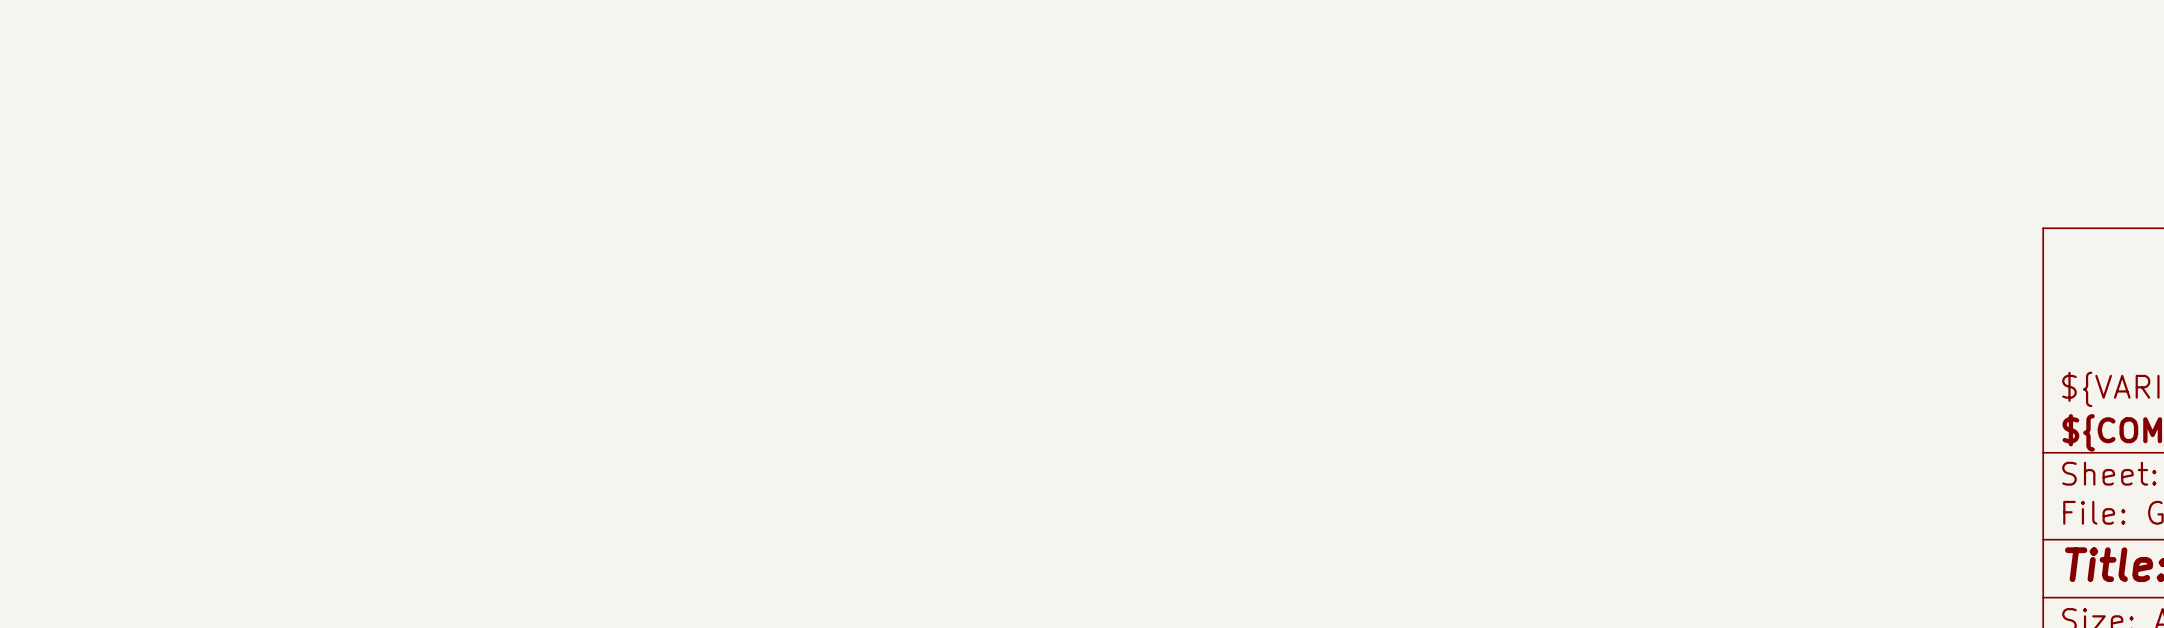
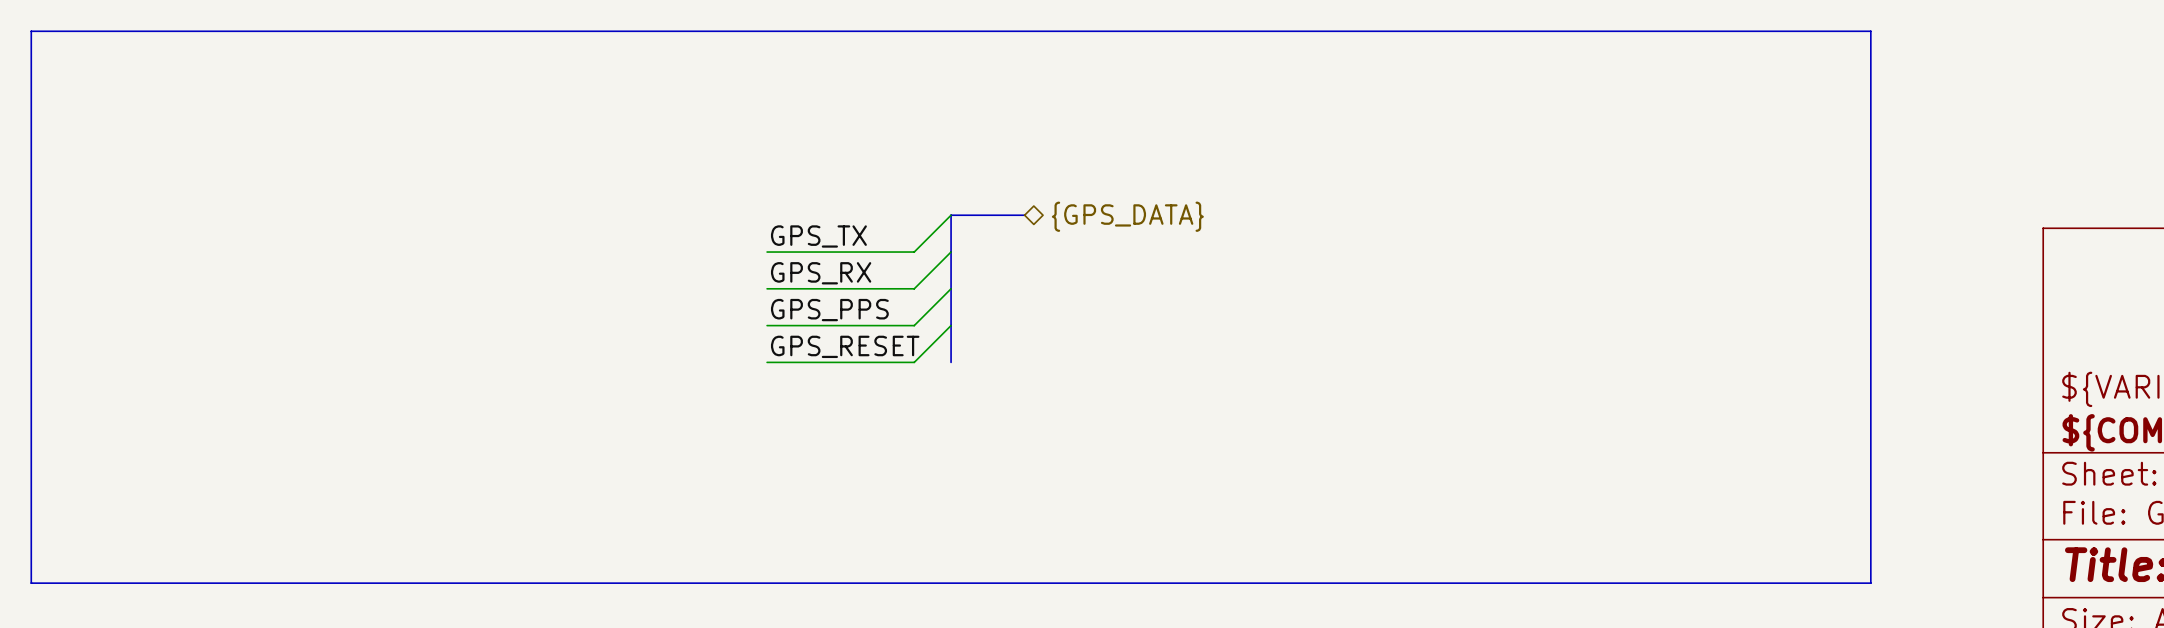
line: none -> (31, 31) (1870, 31) (1870, 583) (31, 583) (31, 31)
wire: none -> (951, 215) (914, 252) (767, 252)
bus: none -> (1024, 215) (951, 215) (951, 362)
hierarchical label: none -> {GPS_DATA} (1127, 216)
label: none -> GPS_TX (818, 236)
wire: none -> (951, 252) (914, 288) (767, 288)
label: none -> GPS_RX (821, 273)
wire: none -> (951, 288) (914, 325) (767, 325)
label: none -> GPS_PPS (829, 310)
wire: none -> (951, 325) (914, 362) (767, 362)
label: none -> GPS_RESET (845, 346)

